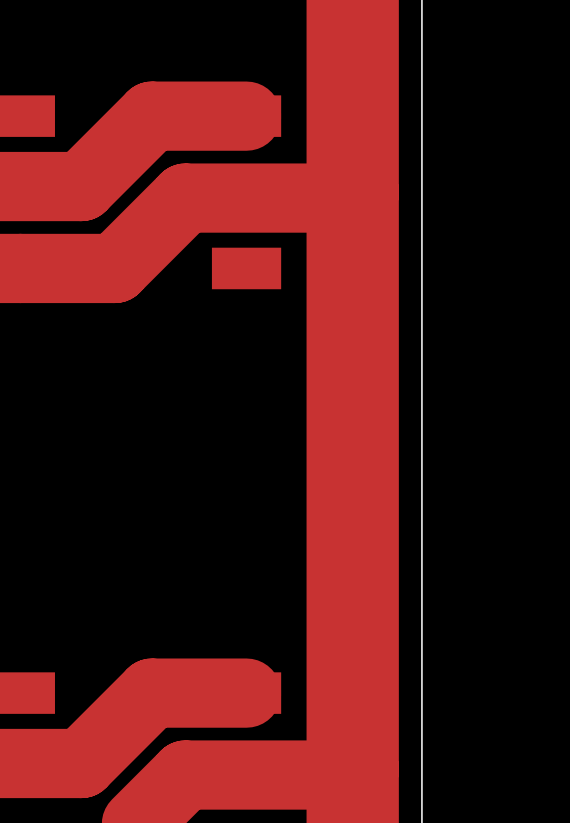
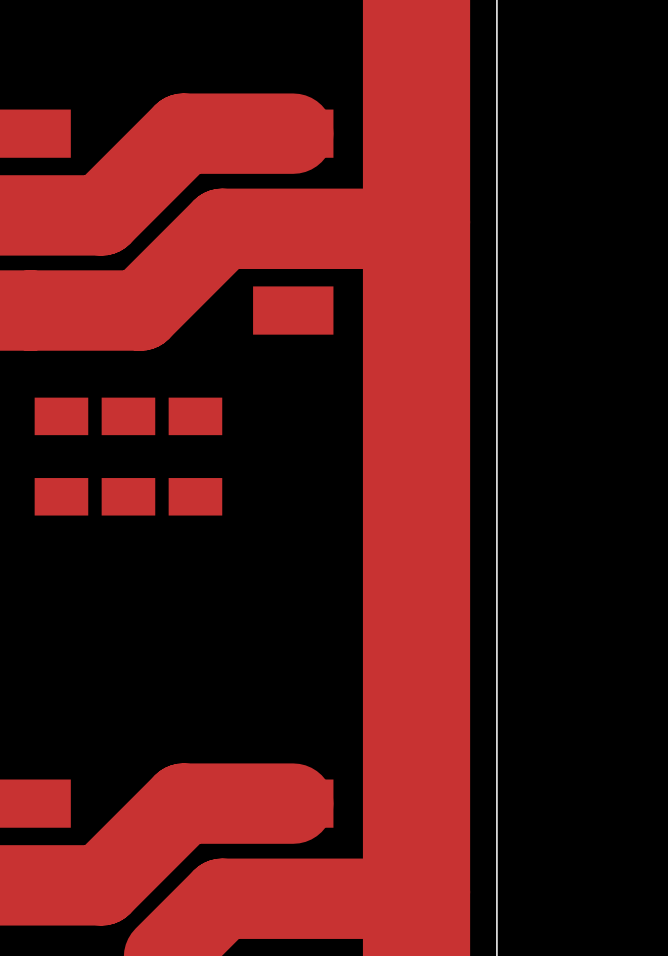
part: none -> (61, 456)
part: none -> (128, 456)
part: none -> (195, 456)

